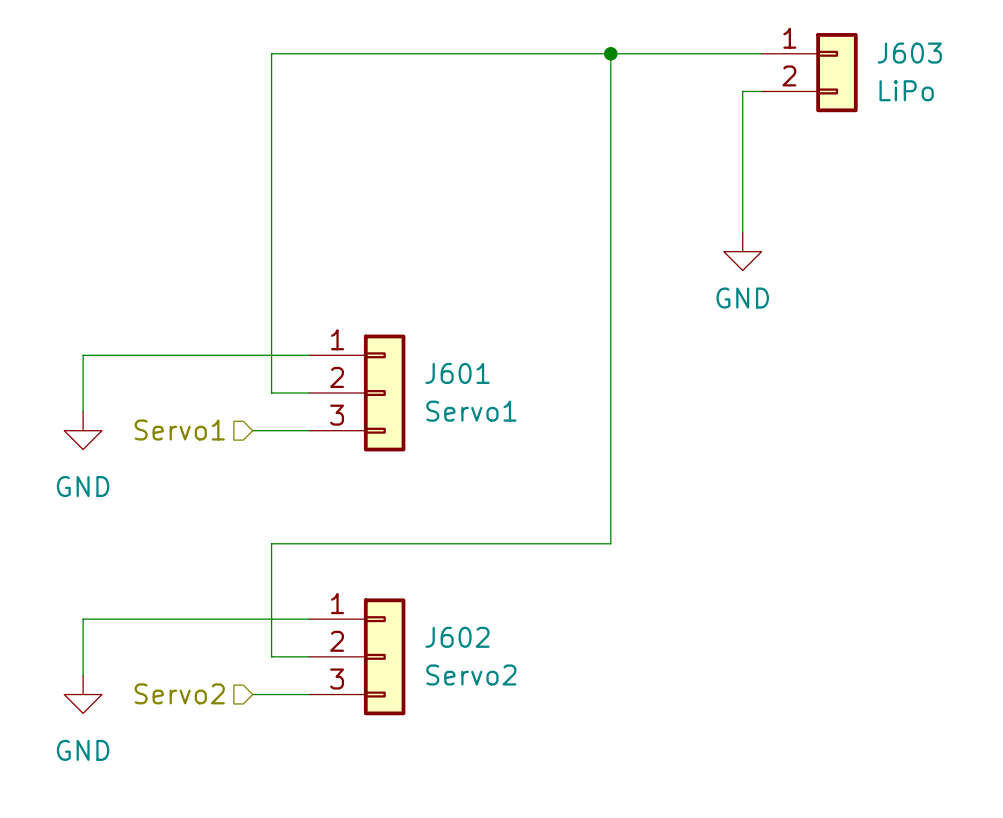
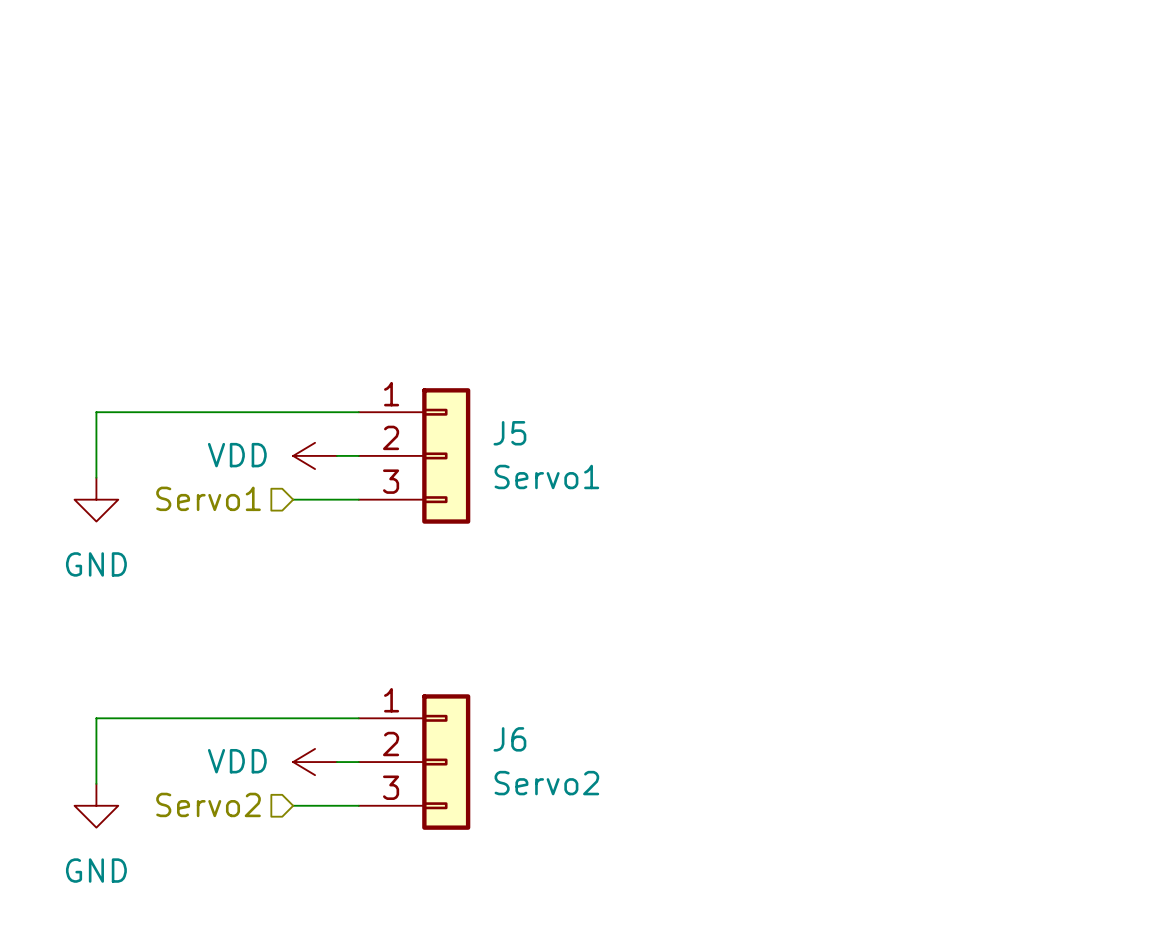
wire: (610, 53) (610, 543) (271, 543) (271, 656) (290, 656) -> none
junction: (610, 53) -> none
wire: (761, 53) (271, 53) (271, 393) (290, 393) -> none
J603: LiPo (809, 72) -> none
wire: (761, 91) (742, 91) (742, 232) -> none
power symbol: GND (742, 251) -> none
J601 name: J601 (457, 373) -> J5 (509, 433)
power symbol: none -> VDD (315, 455)
J602 name: J602 (457, 637) -> J6 (509, 739)
power symbol: none -> VDD (315, 762)

